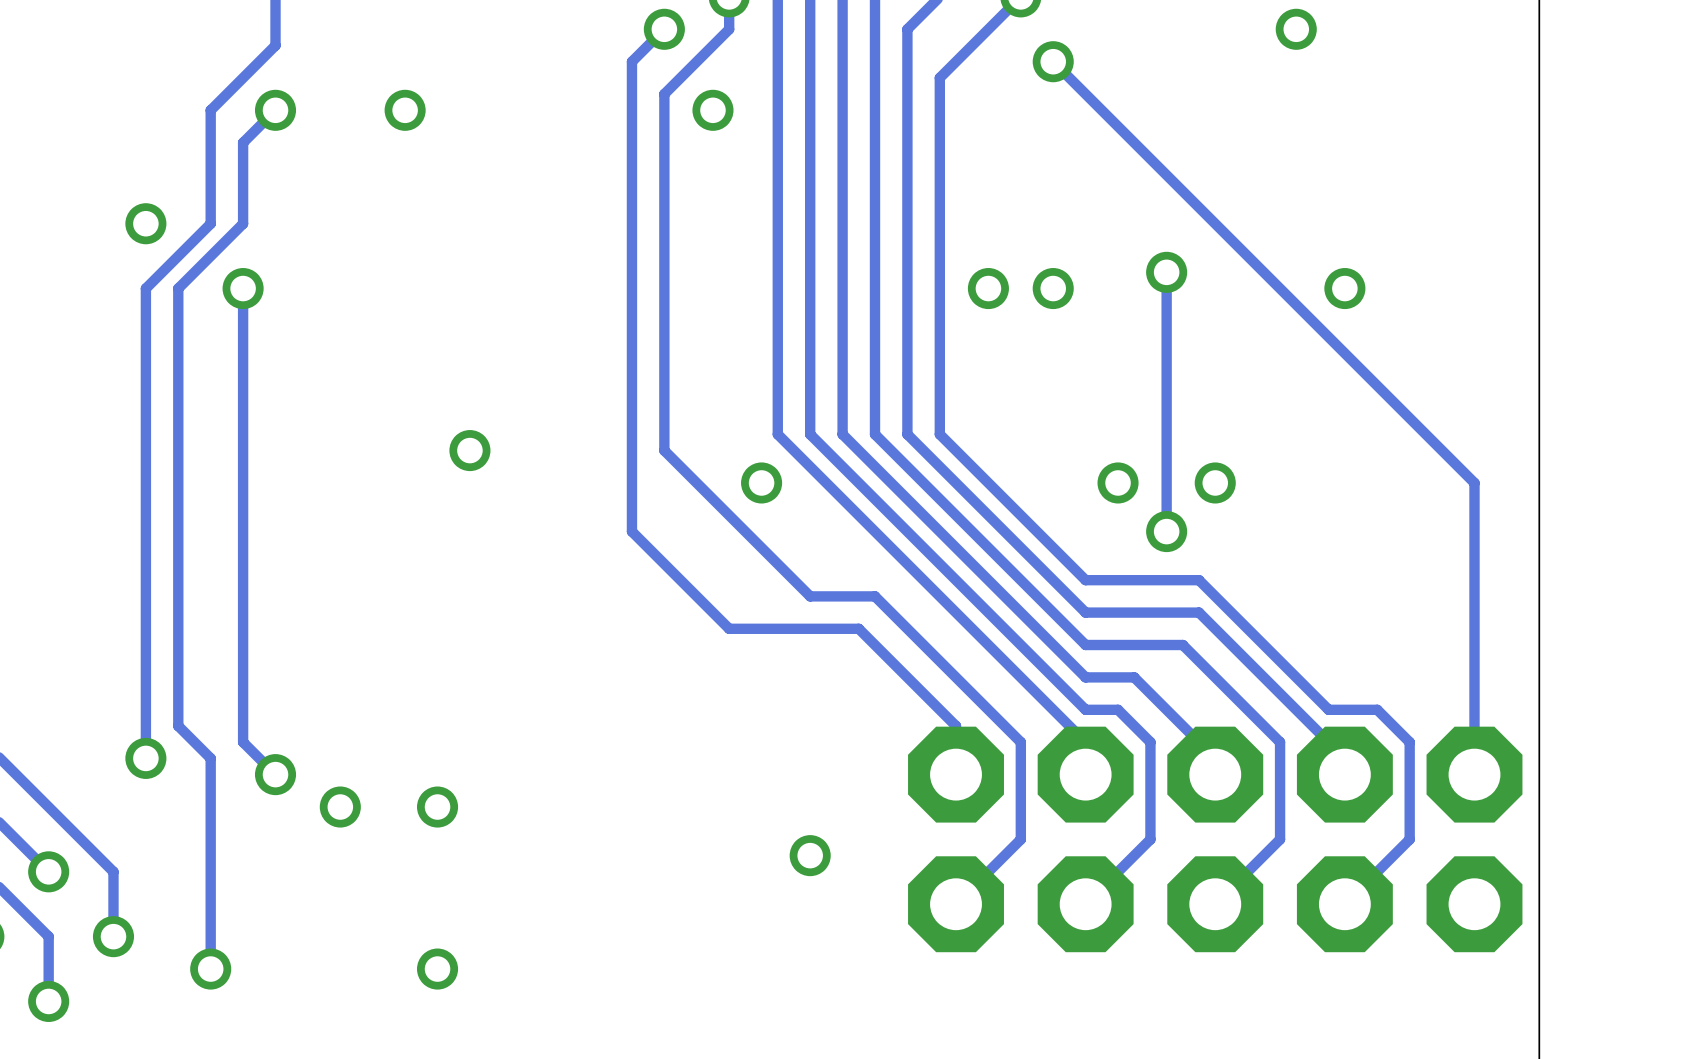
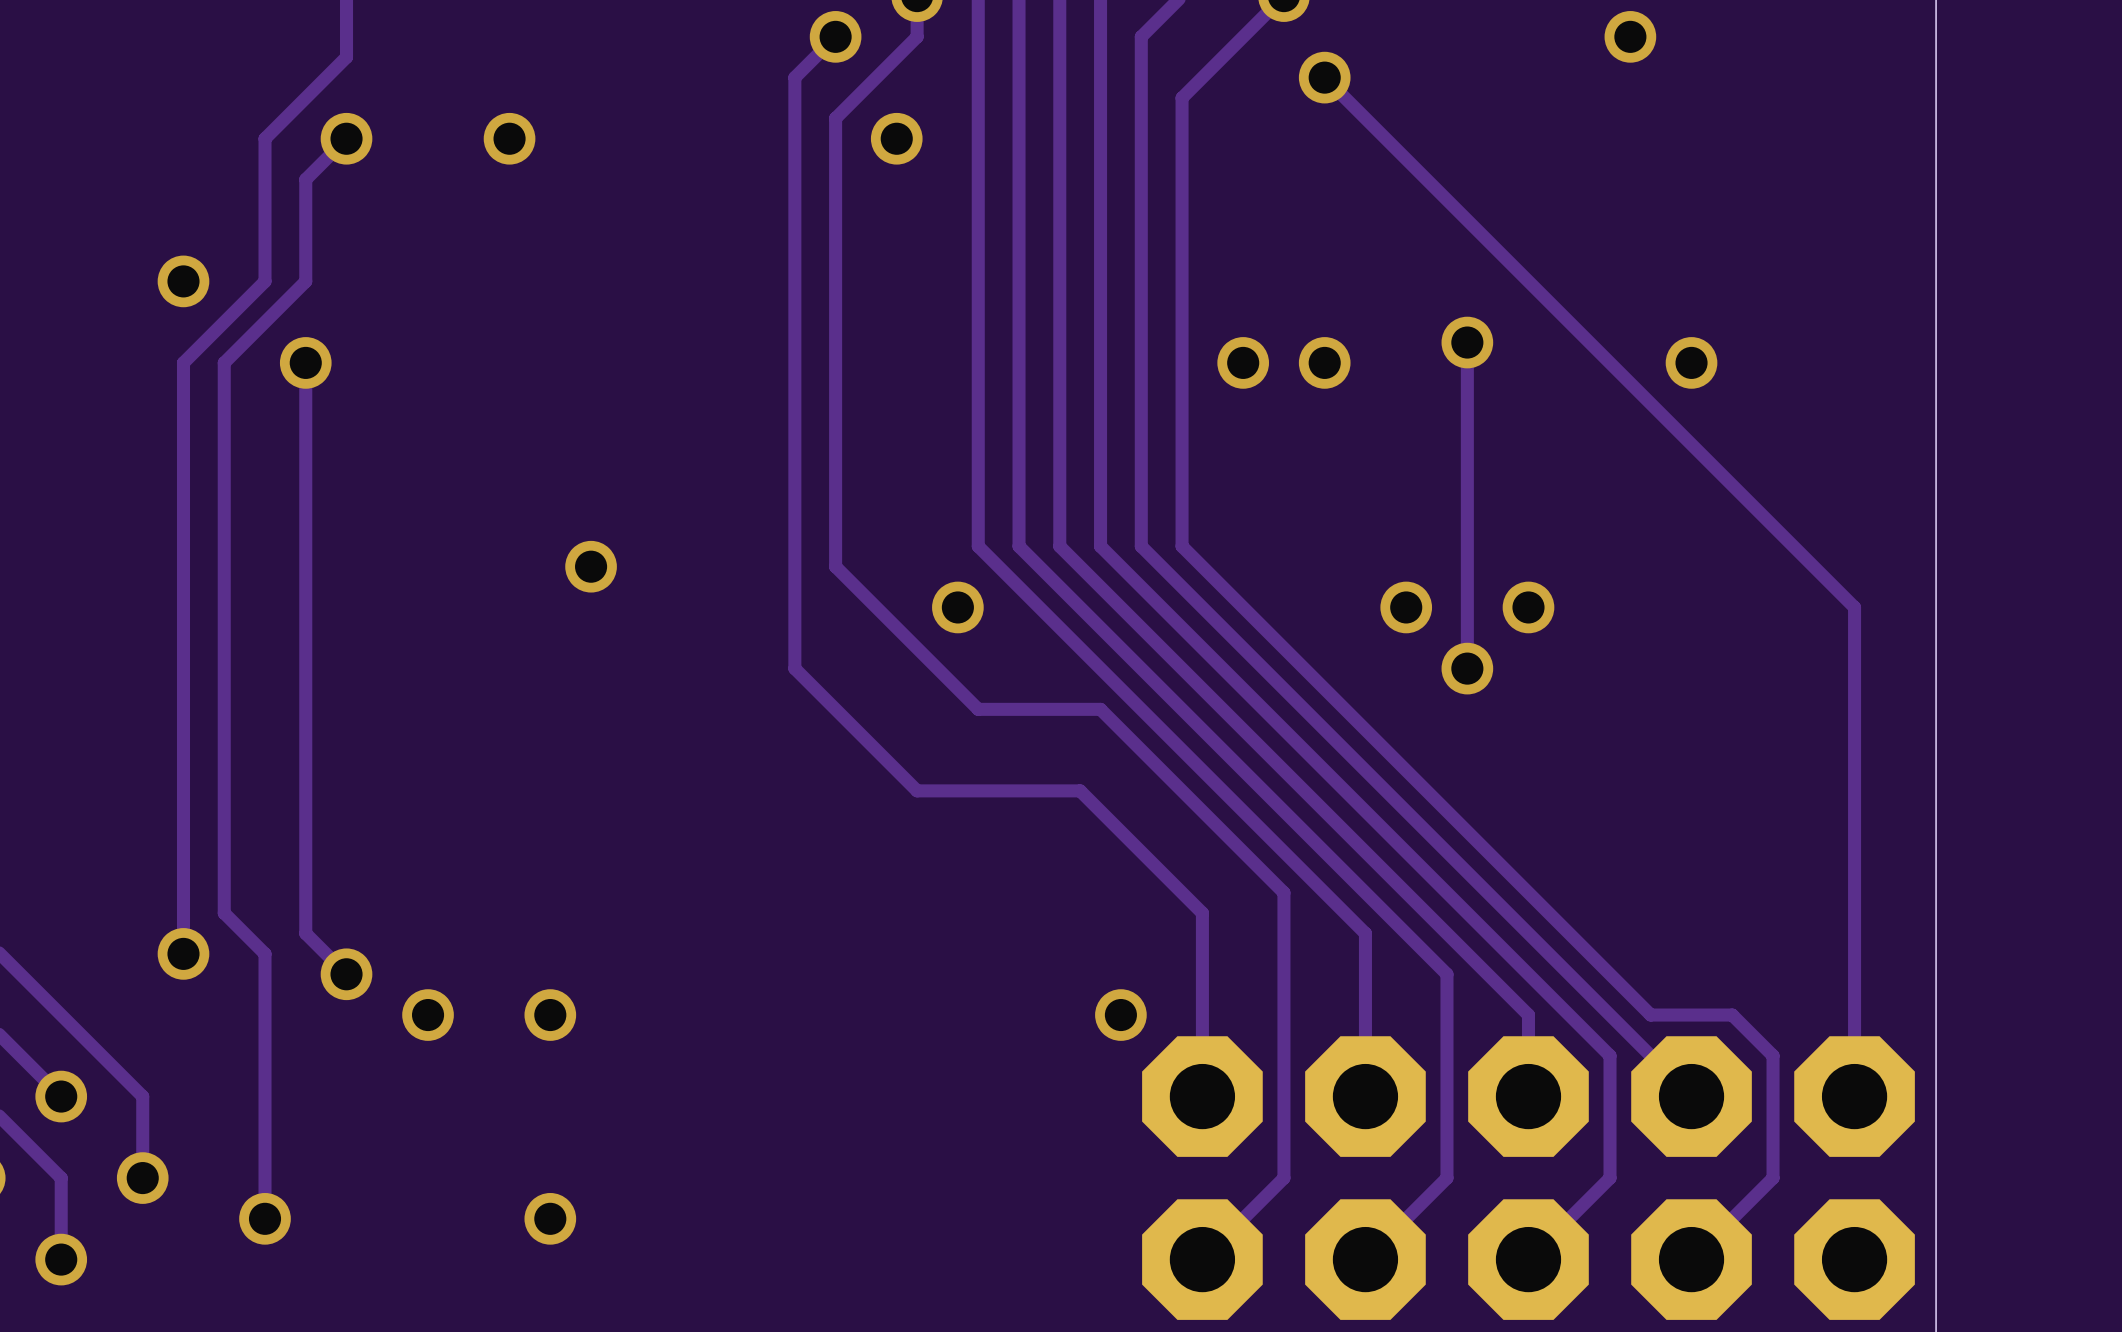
track: (777, 563) (810, 596) (875, 596) (1020, 742) -> (978, 709) (1100, 709) (1283, 892) (1283, 933)
track: (1085, 580) (1199, 580) (1328, 709) (1377, 709) (1409, 742) (1409, 839) (1344, 904) -> (1365, 729) (1650, 1015) (1732, 1015) (1773, 1055) (1773, 1178) (1691, 1259)
track: (1085, 612) (1199, 612) (1344, 758) (1344, 774) -> (1365, 770) (1691, 1096)
track: (1085, 645) (1182, 645) (1280, 742) (1280, 839) (1215, 904) -> (1365, 811) (1610, 1055) (1610, 1178) (1528, 1259)
track: (1085, 677) (1134, 677) (1215, 758) (1215, 774) -> none
track: (1118, 709) (1085, 709) -> (1406, 892) (1365, 852)
track: (1150, 742) (1150, 774) -> (1365, 892) (1446, 974)
track: none -> (1446, 933) (1528, 1015) (1528, 1096)
track: none -> (1202, 974) (1202, 1096)
track: none -> (1365, 974) (1365, 1096)
track: none -> (1854, 974) (1854, 1096)
track: (1020, 839) (956, 904) -> (1283, 1055) (1283, 1178) (1202, 1259)
track: (1150, 839) (1085, 904) -> (1446, 1055) (1446, 1178) (1365, 1259)
part position: (1215, 839) -> (1528, 1178)
via position: (810, 855) -> (1120, 1015)

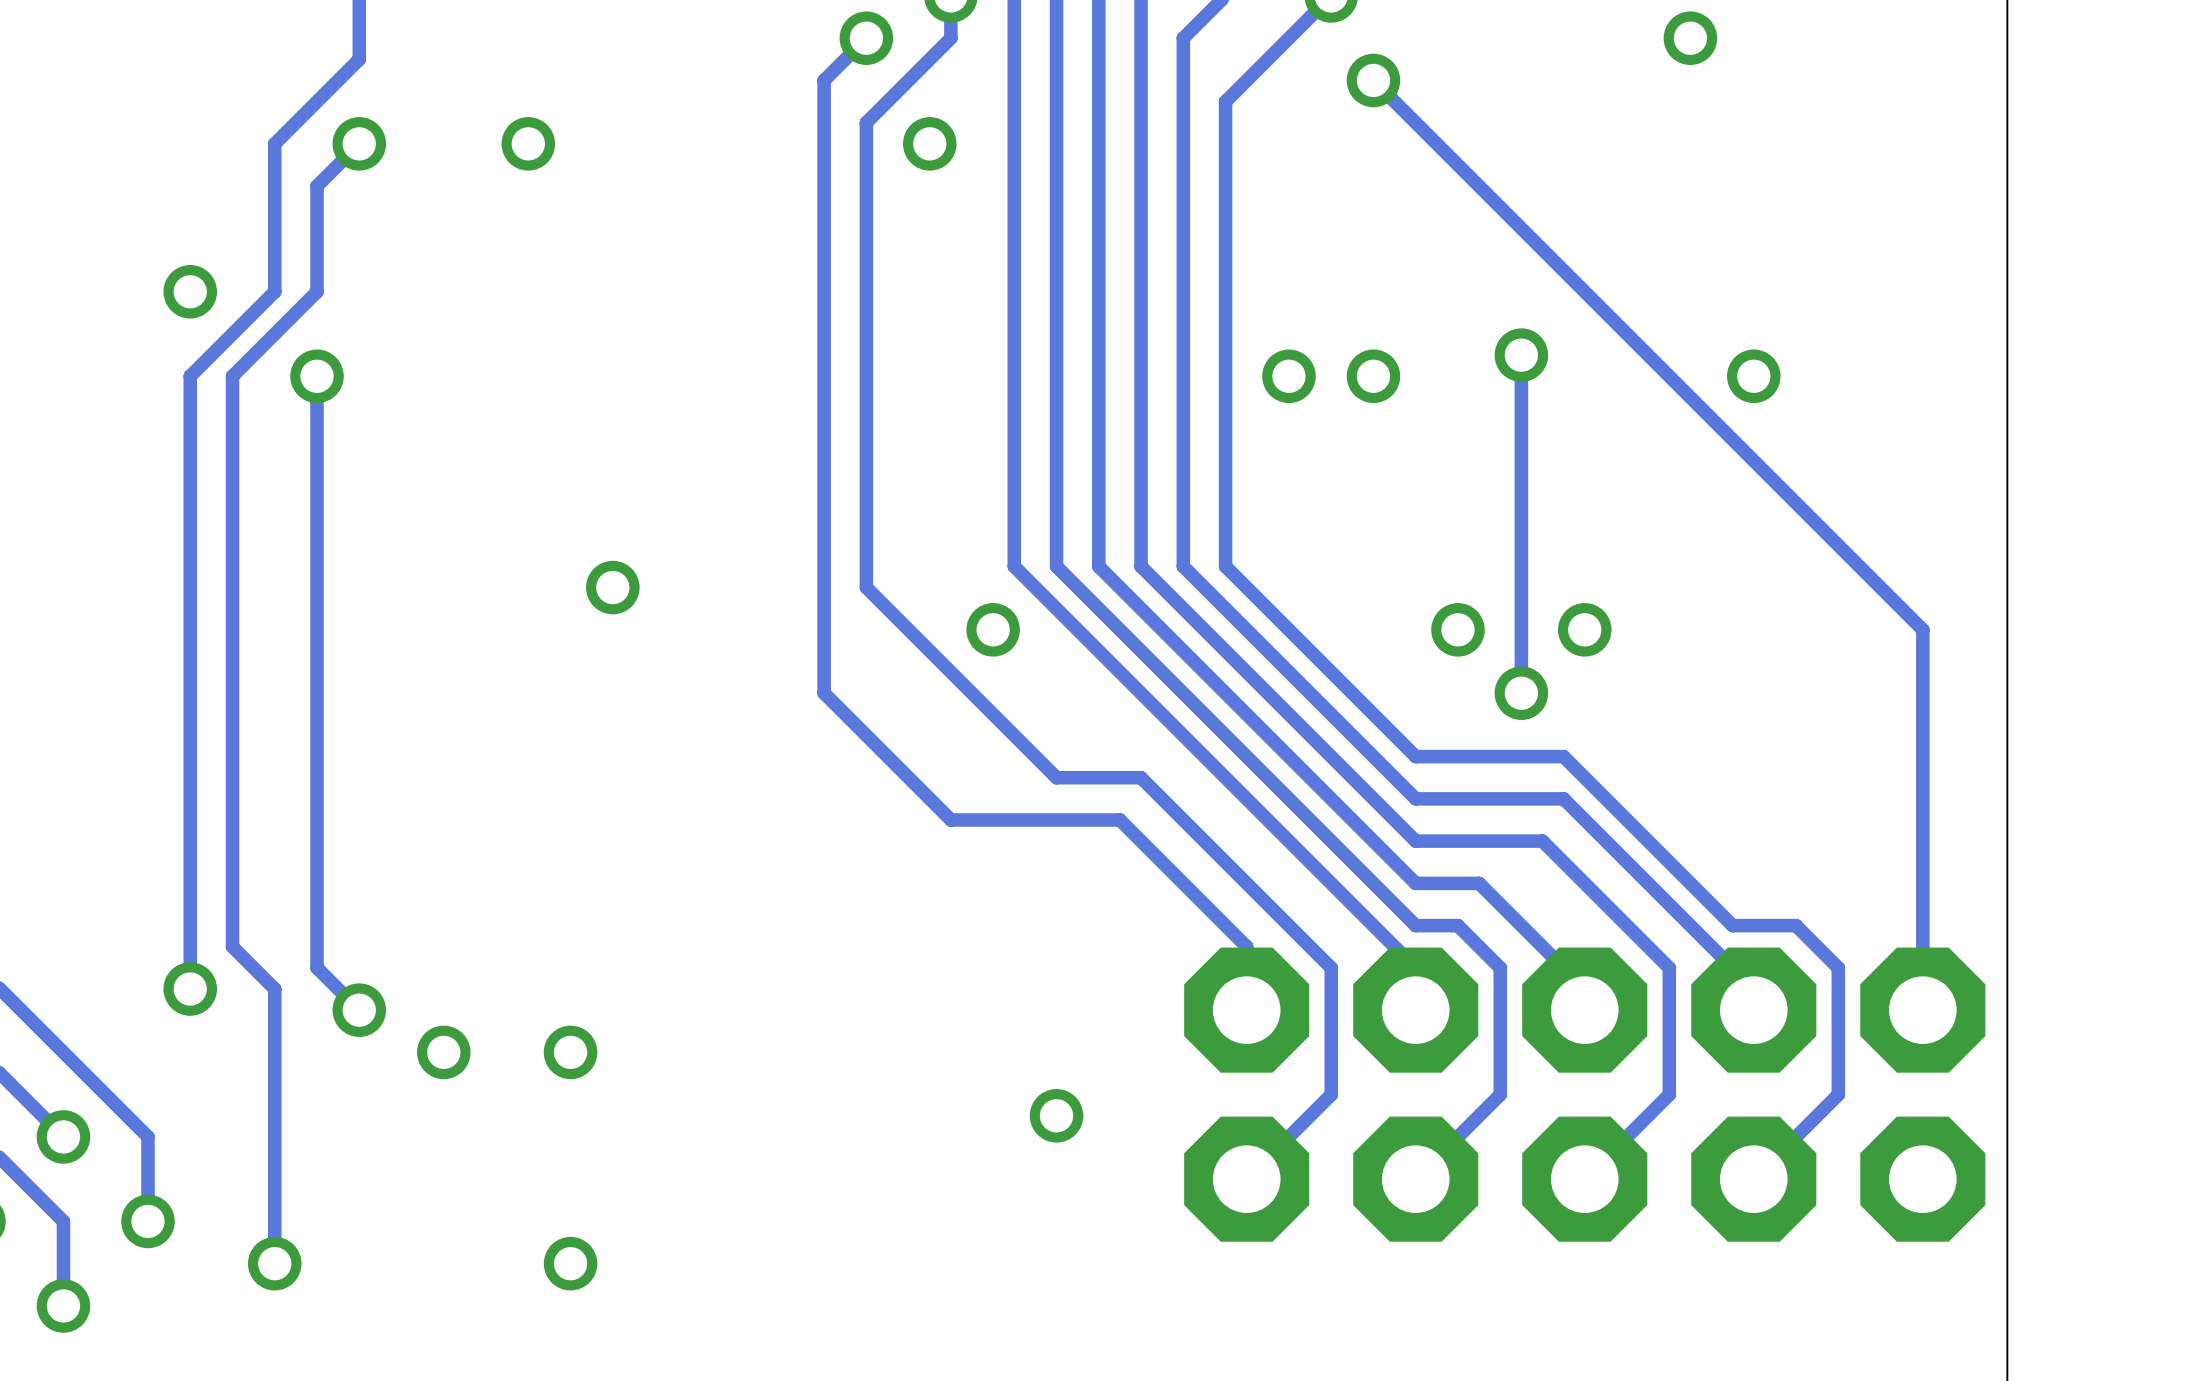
track: (978, 709) (1100, 709) (1283, 892) (1283, 933) -> (1014, 735) (1056, 777) (1141, 777) (1331, 967)
track: (1365, 729) (1650, 1015) (1732, 1015) (1773, 1055) (1773, 1178) (1691, 1259) -> (1415, 756) (1563, 756) (1732, 925) (1796, 925) (1838, 967) (1838, 1094) (1753, 1179)
track: (1365, 770) (1691, 1096) -> (1415, 798) (1563, 798) (1753, 989) (1753, 1010)
track: (1365, 811) (1610, 1055) (1610, 1178) (1528, 1259) -> (1415, 841) (1542, 841) (1669, 967) (1669, 1094) (1584, 1179)
track: (1365, 852) (1406, 892) -> (1415, 925) (1457, 925)
track: none -> (1415, 883) (1479, 883) (1584, 989) (1584, 1010)
track: (1365, 892) (1446, 974) -> (1500, 967) (1500, 1010)
track: (1446, 933) (1528, 1015) (1528, 1096) -> none
track: (1202, 974) (1202, 1096) -> none
track: (1365, 974) (1365, 1096) -> none
track: (1854, 974) (1854, 1096) -> none
via position: (1120, 1015) -> (1056, 1115)
track: (1283, 1055) (1283, 1178) (1202, 1259) -> (1331, 1094) (1246, 1179)
track: (1446, 1055) (1446, 1178) (1365, 1259) -> (1500, 1094) (1415, 1179)
part position: (1528, 1178) -> (1584, 1094)

